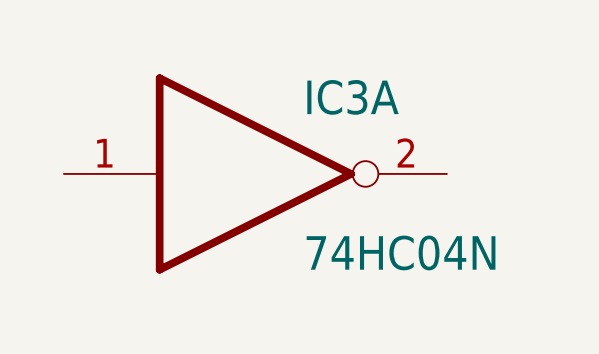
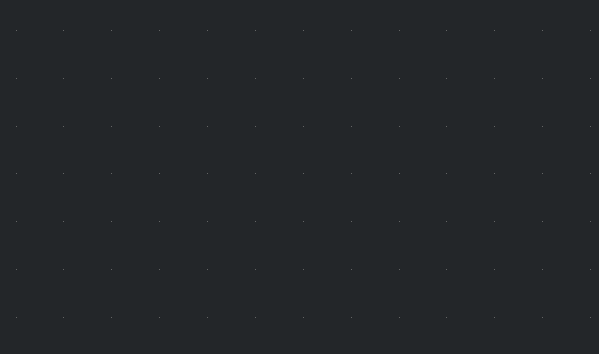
IC3A: 74HC04N (255, 173) -> none

